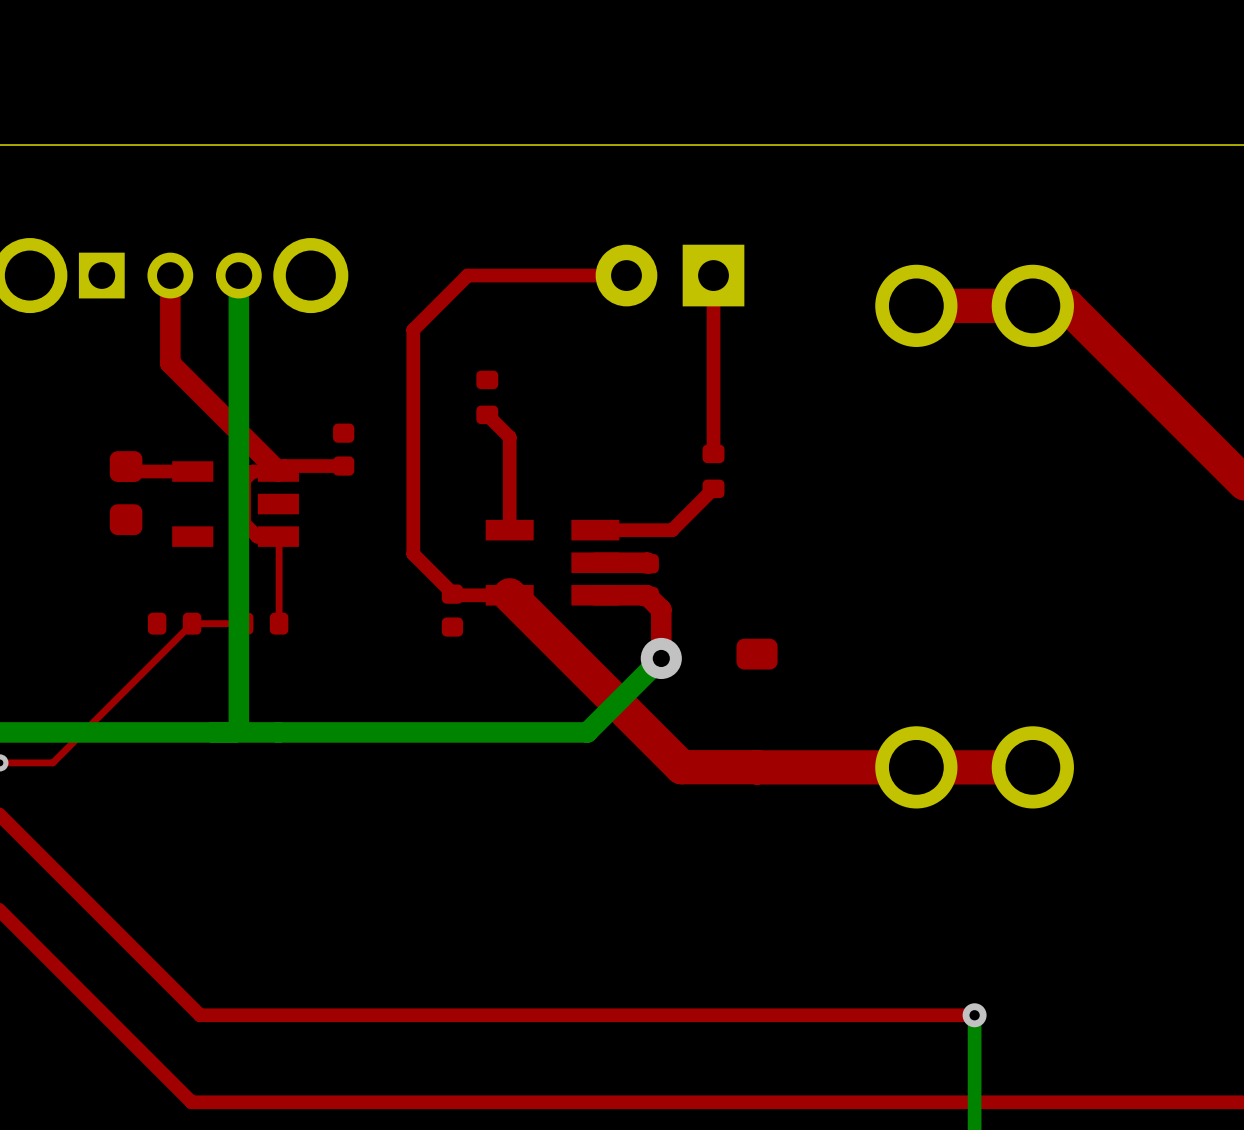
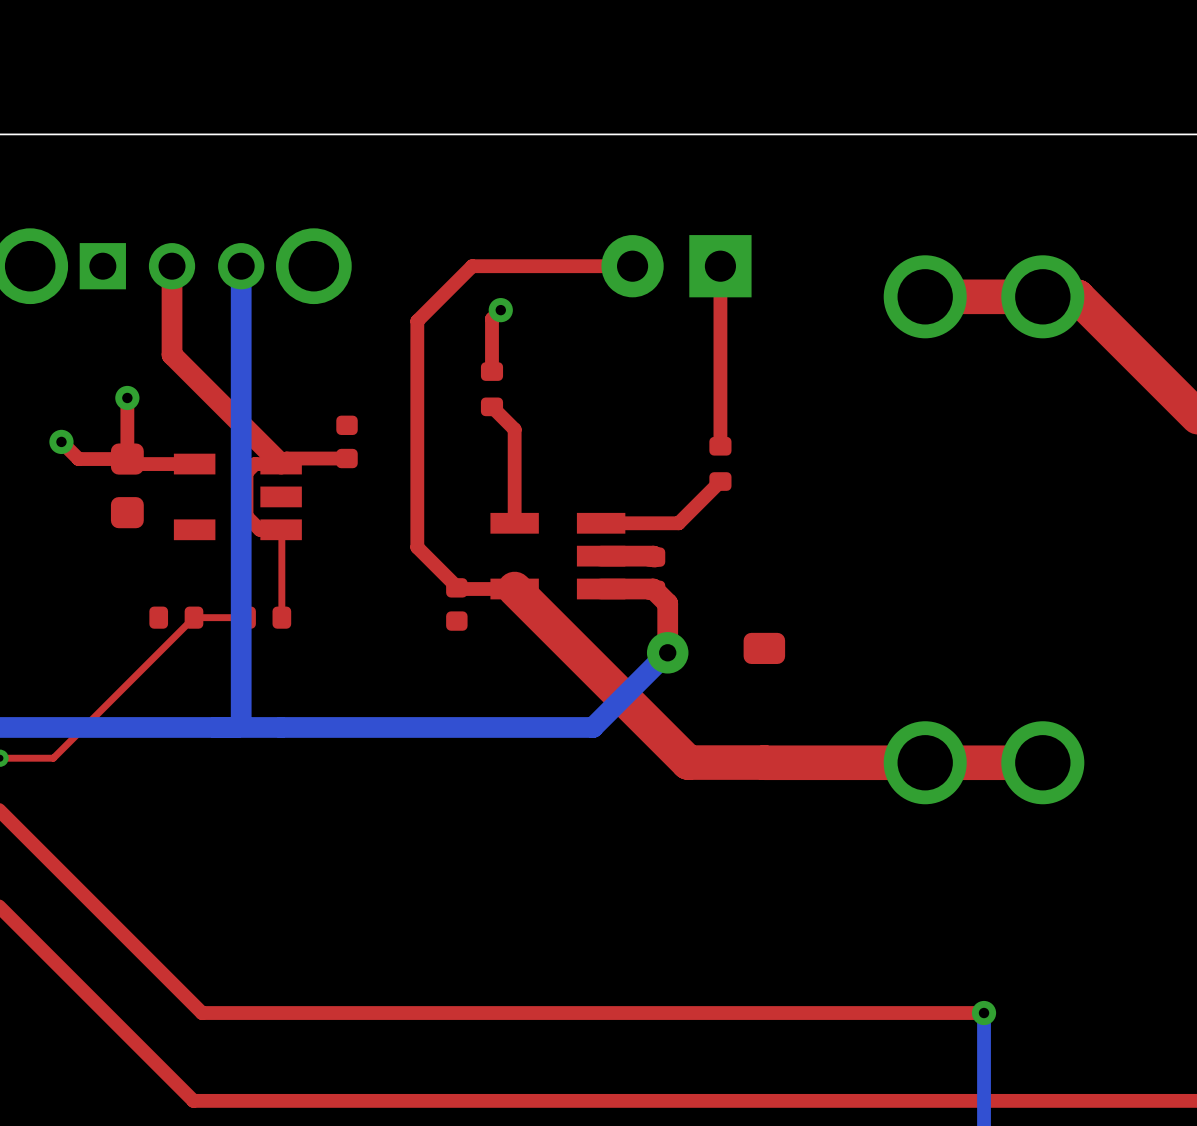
top track: none -> (500, 310) (491, 318) (491, 371)
via: none -> (500, 310)
top track: none -> (127, 397) (127, 459) (78, 459) (61, 441)
via: none -> (127, 397)
via: none -> (61, 441)

